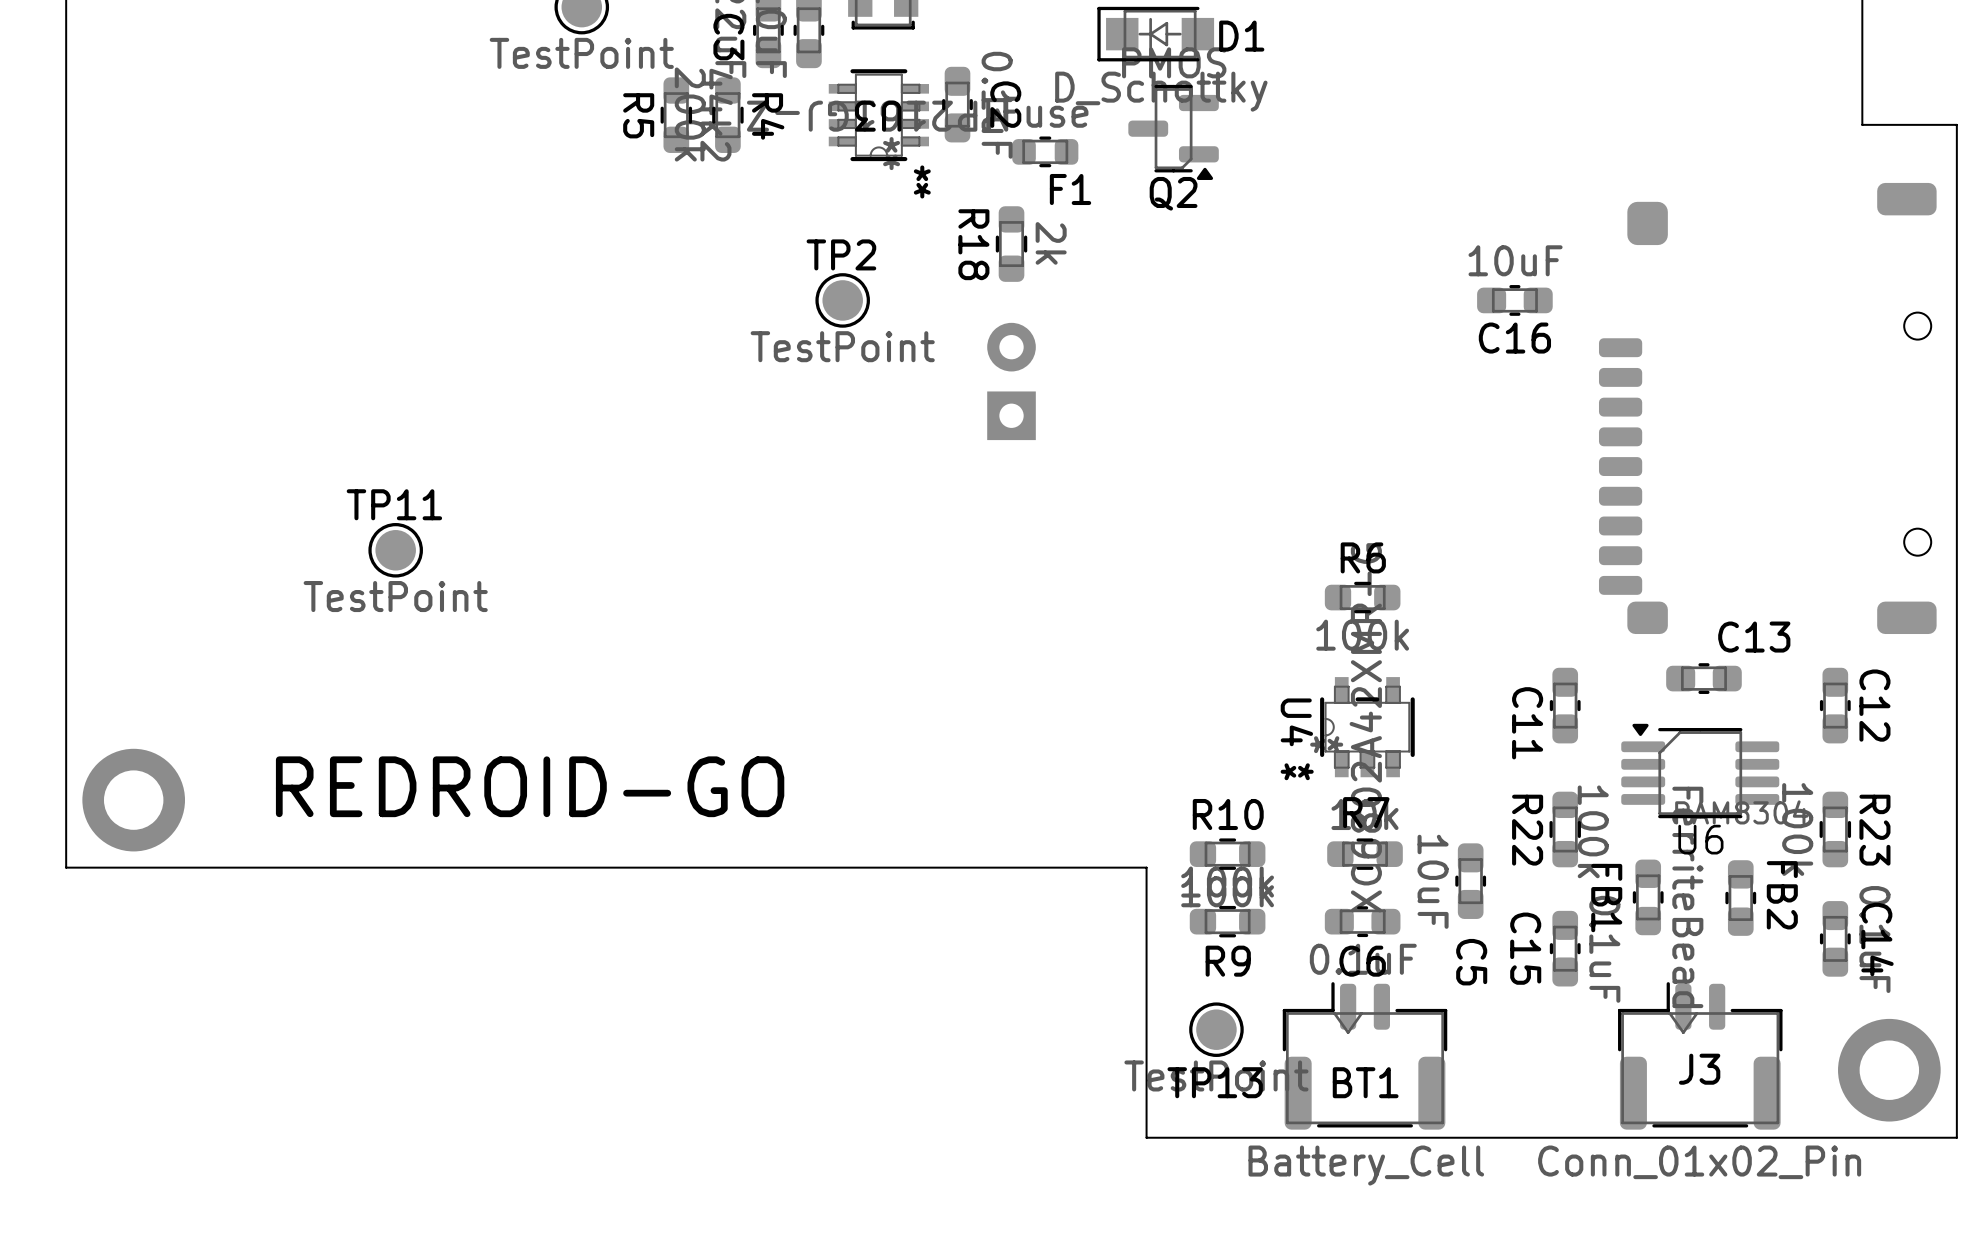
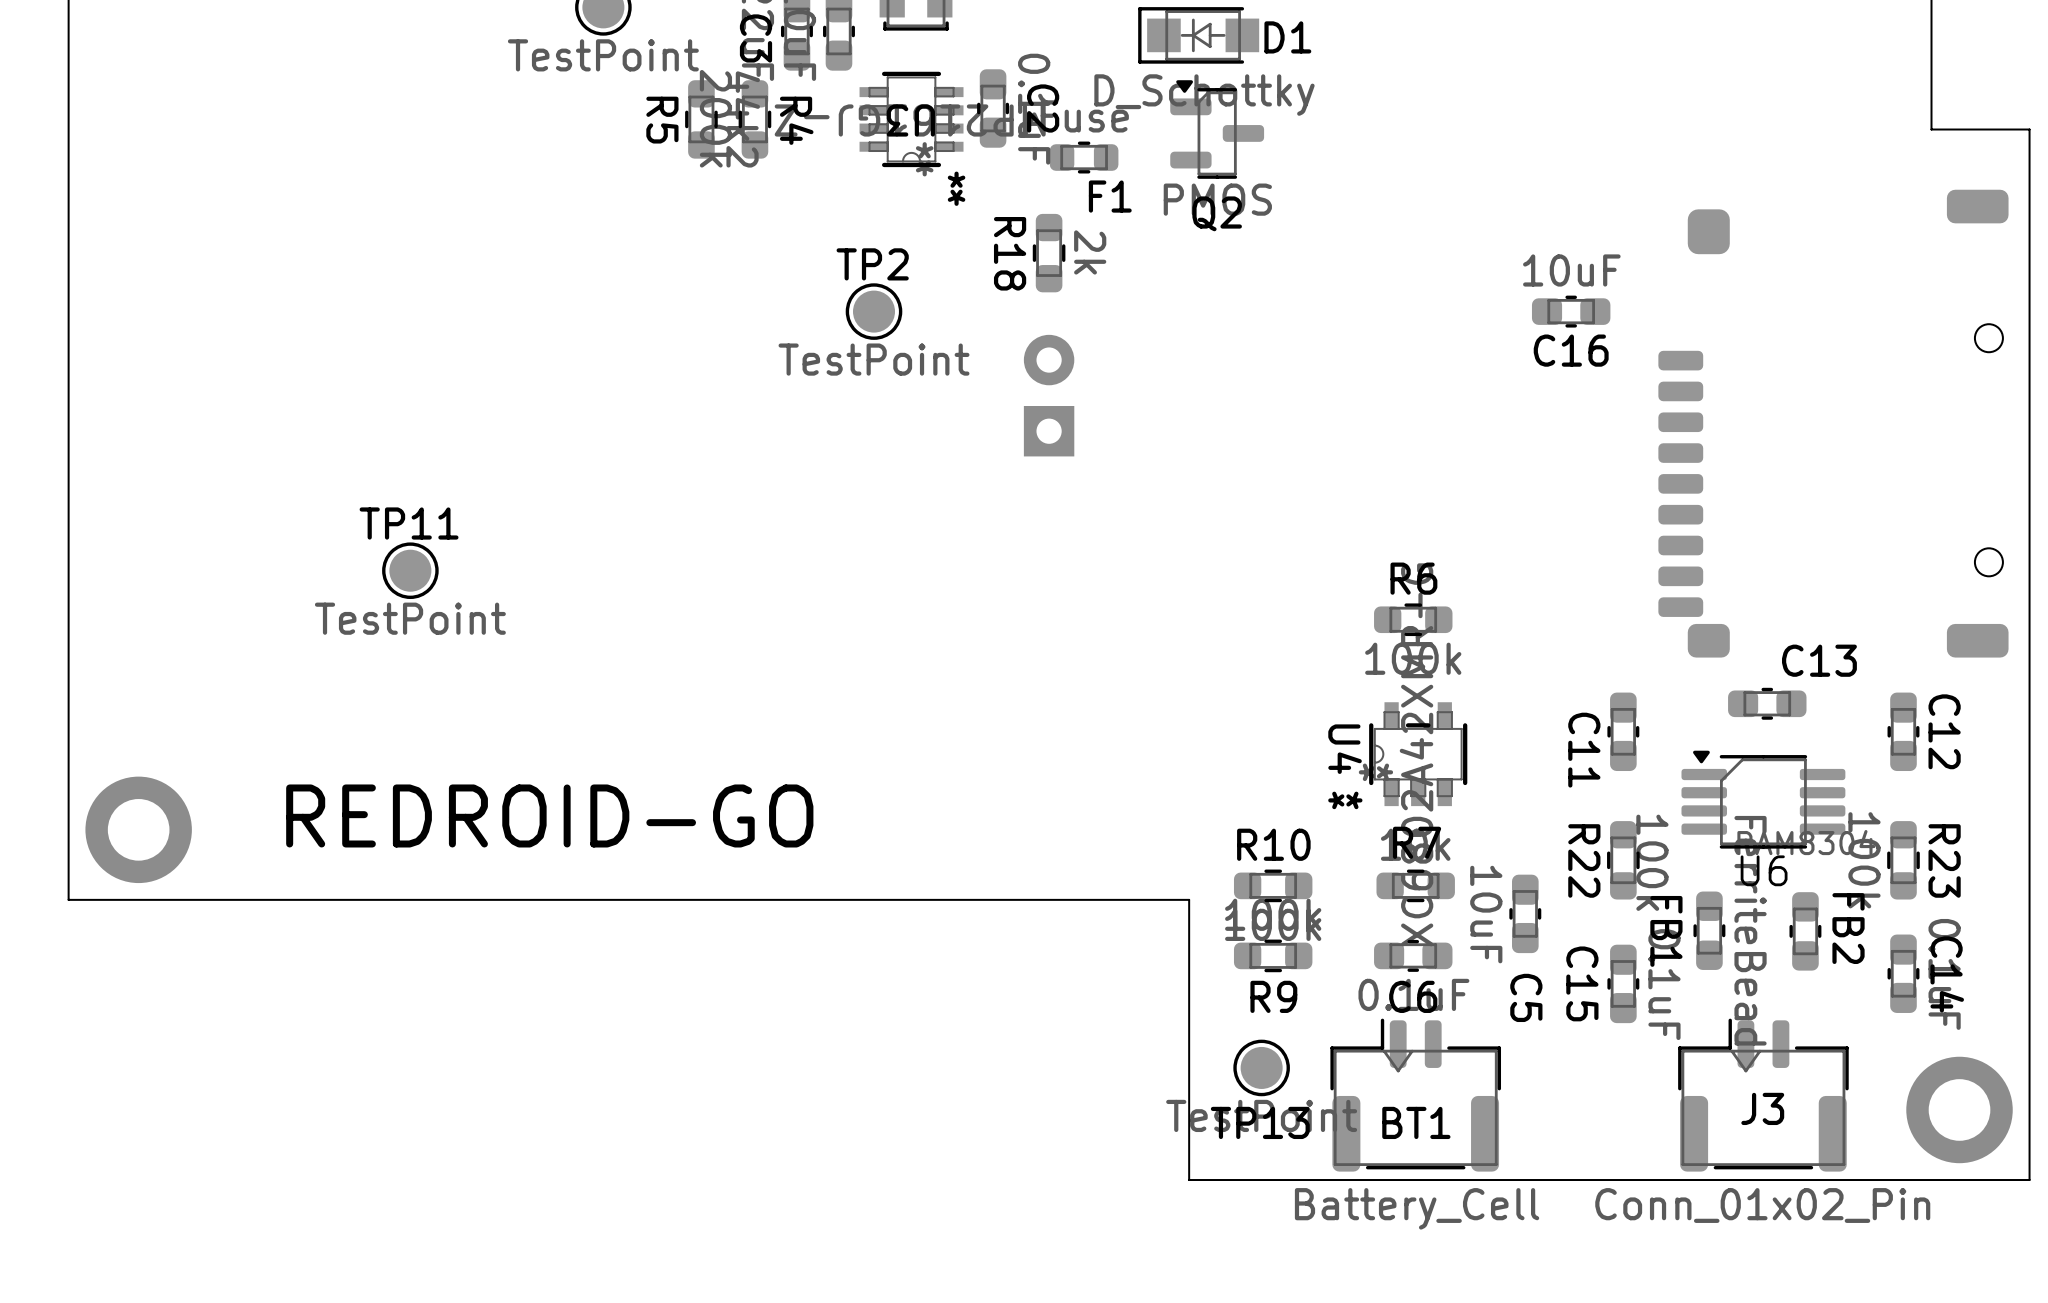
Q2 rotation: 0° (1173, 132) -> 180° (1217, 129)

